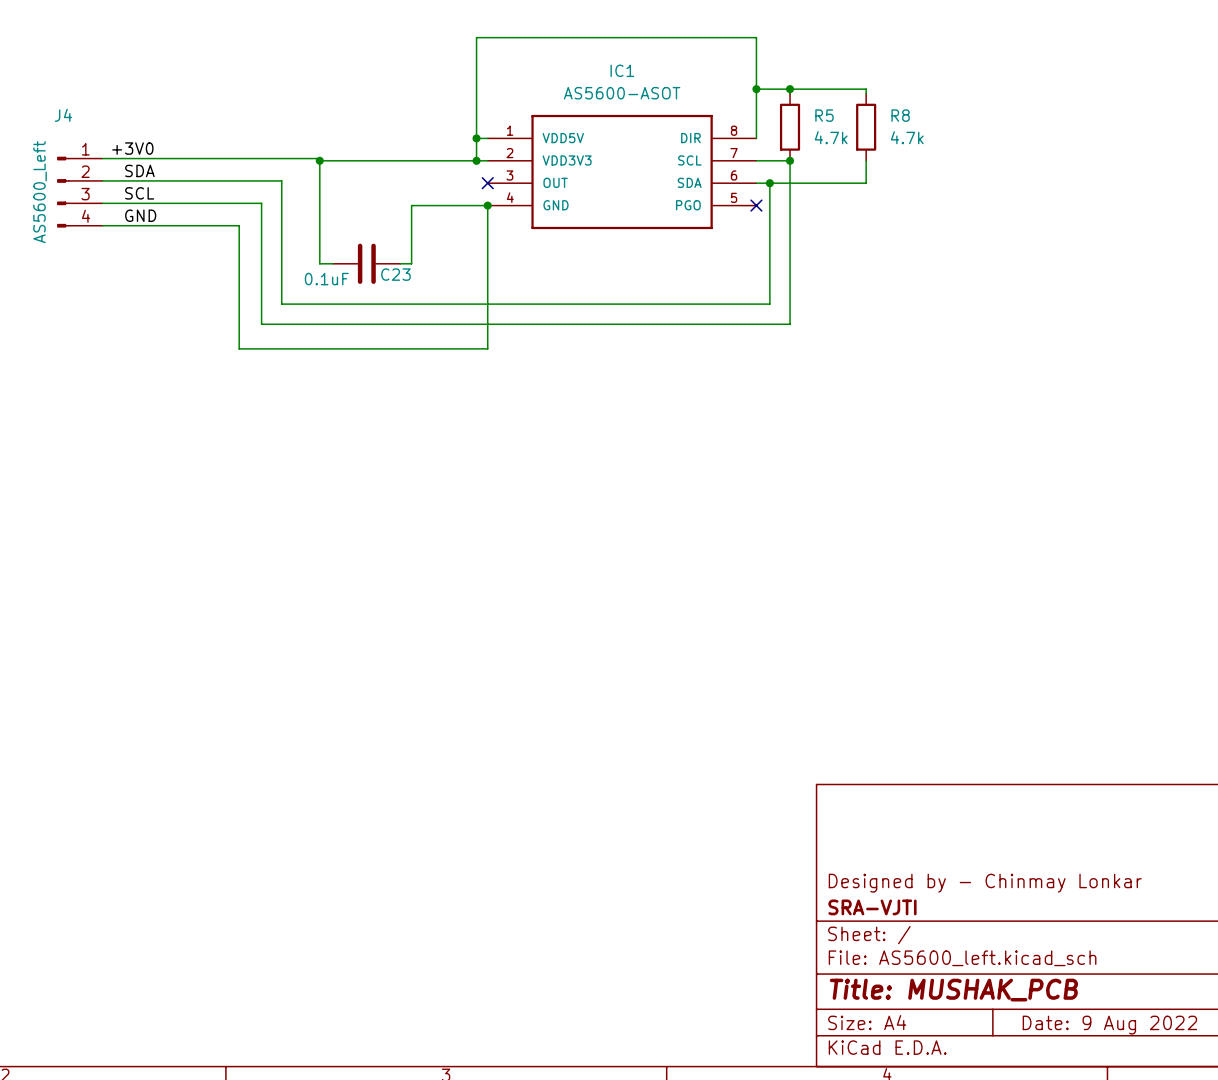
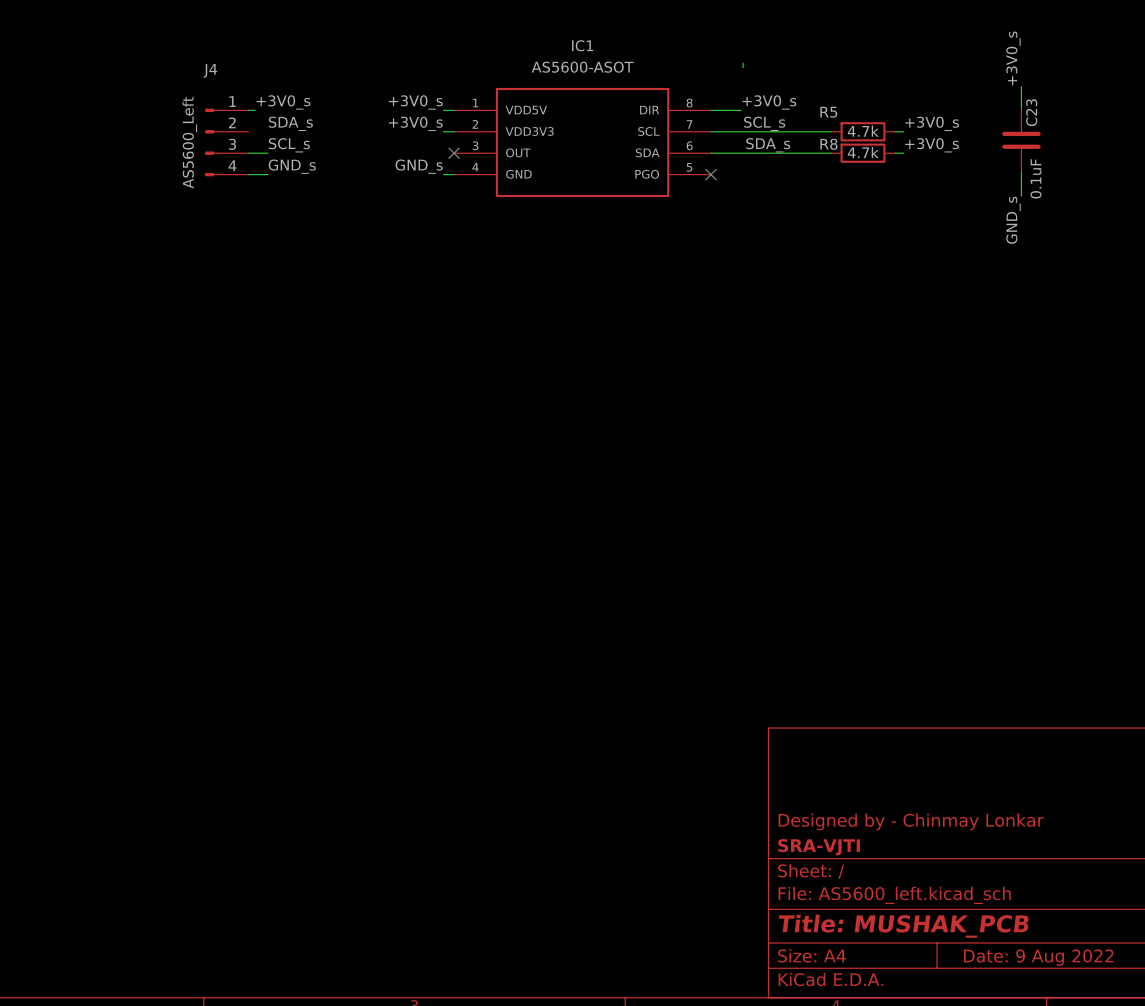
label: none -> +3V0_s (1013, 58)
wire: (756, 89) (866, 89) (866, 93) -> none
junction: (756, 89) -> none
junction: (790, 89) -> none
wire: none -> (1021, 86) (1021, 108)
R5 name position: R5 (824, 115) -> R5 (828, 112)
R8 name position: R8 (900, 115) -> R8 (828, 144)
R5 rotation: 0° (790, 127) -> 90° clockwise (863, 153)
R5 position: (790, 127) -> (863, 153)
R8 rotation: 0° (866, 127) -> 90° clockwise (863, 131)
R8 position: (866, 127) -> (863, 131)
label: none -> +3V0_s (283, 102)
label: none -> +3V0_s (415, 102)
label: none -> +3V0_s (769, 102)
R5 value position: 4.7k (831, 137) -> 4.7k (863, 152)
R8 value position: 4.7k (907, 137) -> 4.7k (863, 131)
wire: none -> (248, 110) (255, 110)
junction: (476, 138) -> none
wire: (756, 138) (756, 37) (476, 37) (476, 160) (319, 160) -> (711, 110) (740, 110)
label: +3V0 (132, 148) -> none
label: none -> SDA_s (290, 123)
label: none -> +3V0_s (415, 123)
label: none -> SCL_s (764, 123)
label: none -> +3V0_s (932, 123)
wire: (102, 158) (319, 158) (319, 263) (333, 263) -> none
junction: (319, 160) -> none
junction: (476, 160) -> none
wire: (790, 160) (790, 324) (261, 324) (261, 203) (102, 203) -> (743, 131) (830, 131)
junction: (790, 160) -> none
wire: (866, 160) (866, 183) -> (830, 153) (815, 153)
wire: none -> (895, 131) (903, 131)
label: SDA (139, 170) -> none
label: none -> SCL_s (289, 145)
label: none -> SDA_s (768, 145)
label: none -> +3V0_s (932, 145)
wire: (102, 180) (281, 180) (281, 304) (769, 304) (769, 183) -> none
wire: none -> (248, 153) (267, 153)
junction: (769, 183) -> none
wire: none -> (895, 153) (903, 153)
J4 position: (79, 192) -> (226, 142)
label: SCL (139, 193) -> none
label: none -> GND_s (292, 166)
label: none -> GND_s (419, 166)
wire: none -> (1021, 172) (1021, 196)
wire: none -> (248, 174) (267, 174)
wire: (476, 205) (411, 205) (411, 263) (400, 263) -> none
wire: (487, 205) (487, 348) (239, 348) (239, 225) (102, 225) -> none
junction: (487, 205) -> none
label: GND (140, 215) -> none
label: none -> GND_s (1013, 220)
C23 rotation: 0° (366, 263) -> 90° clockwise (1021, 140)
C23 position: (366, 263) -> (1021, 140)
C23 name position: C23 (395, 274) -> C23 (1031, 112)
C23 value position: 0.1uF (326, 279) -> 0.1uF (1036, 178)

